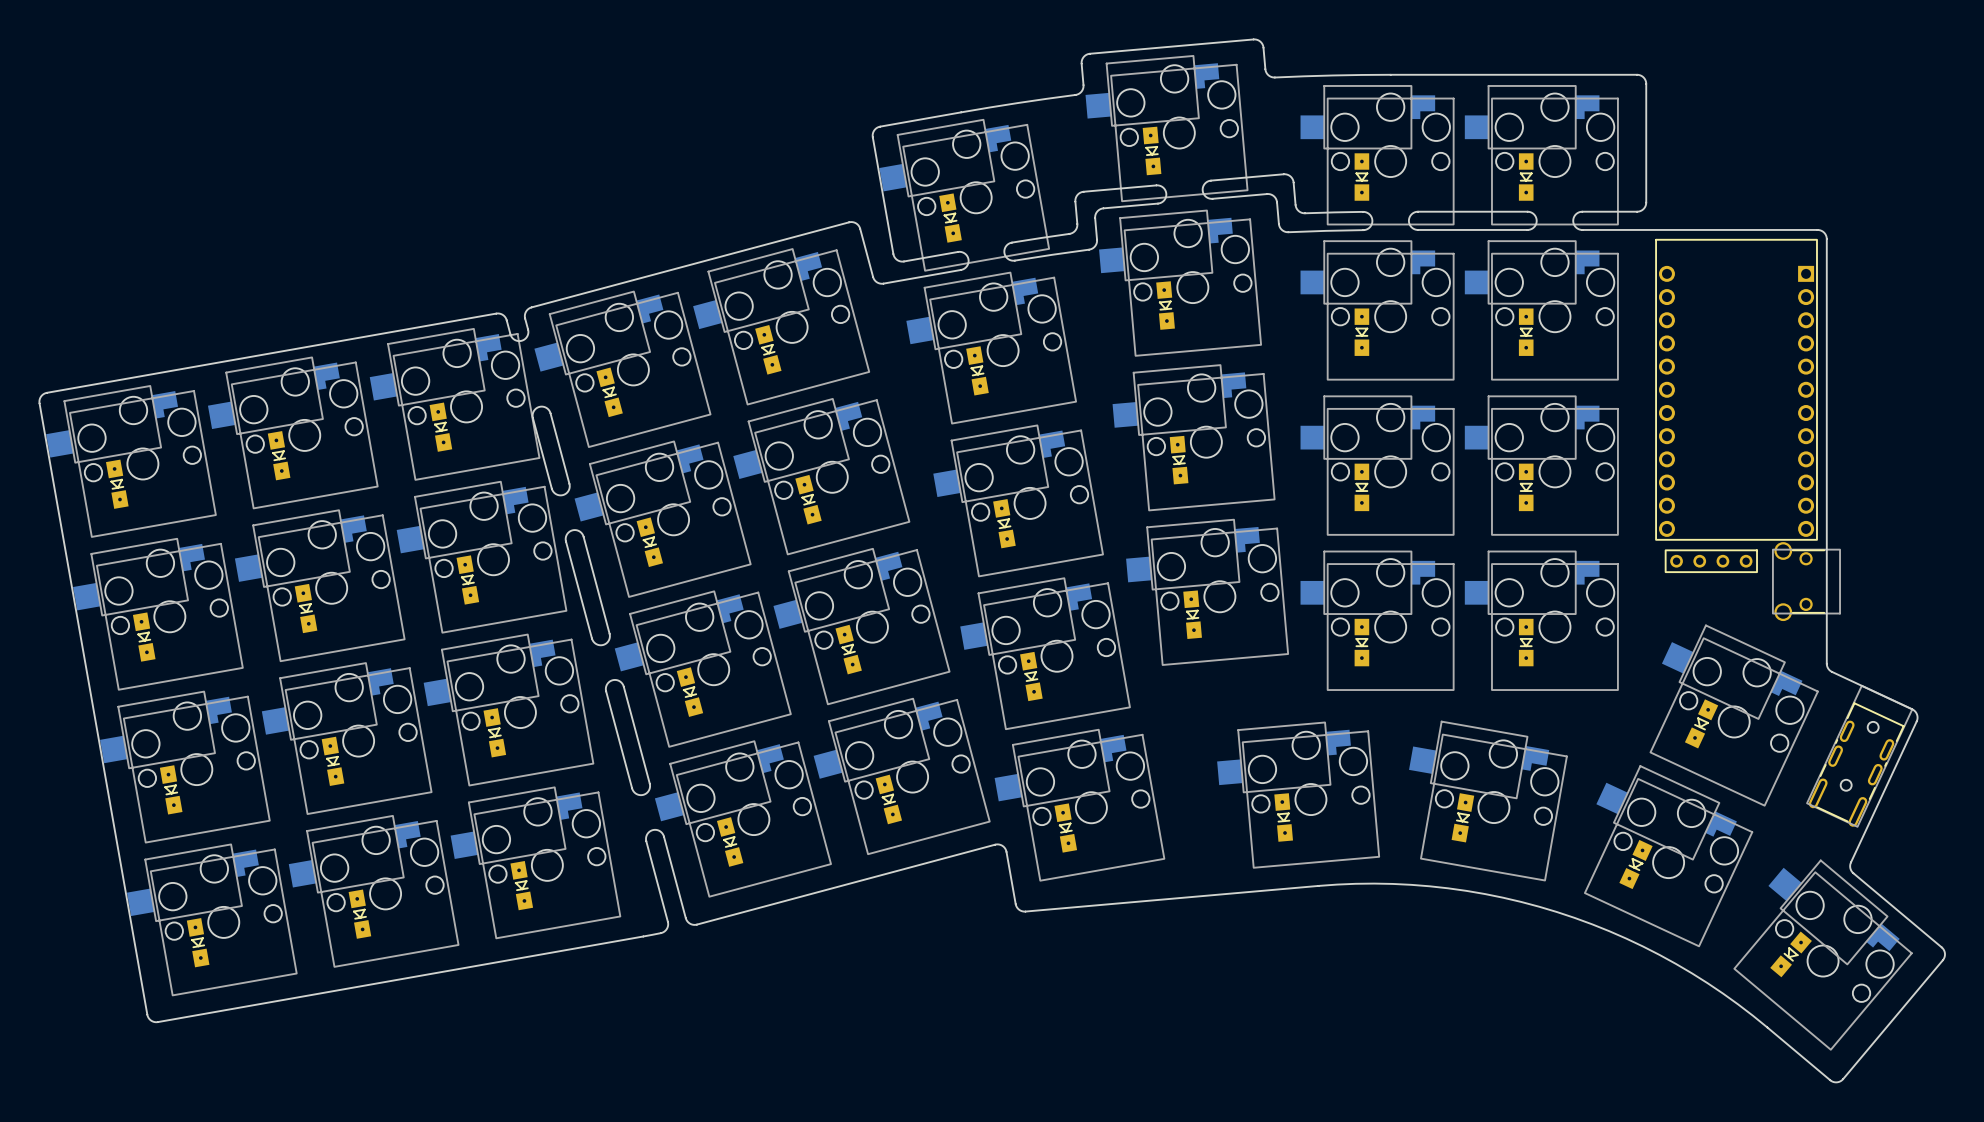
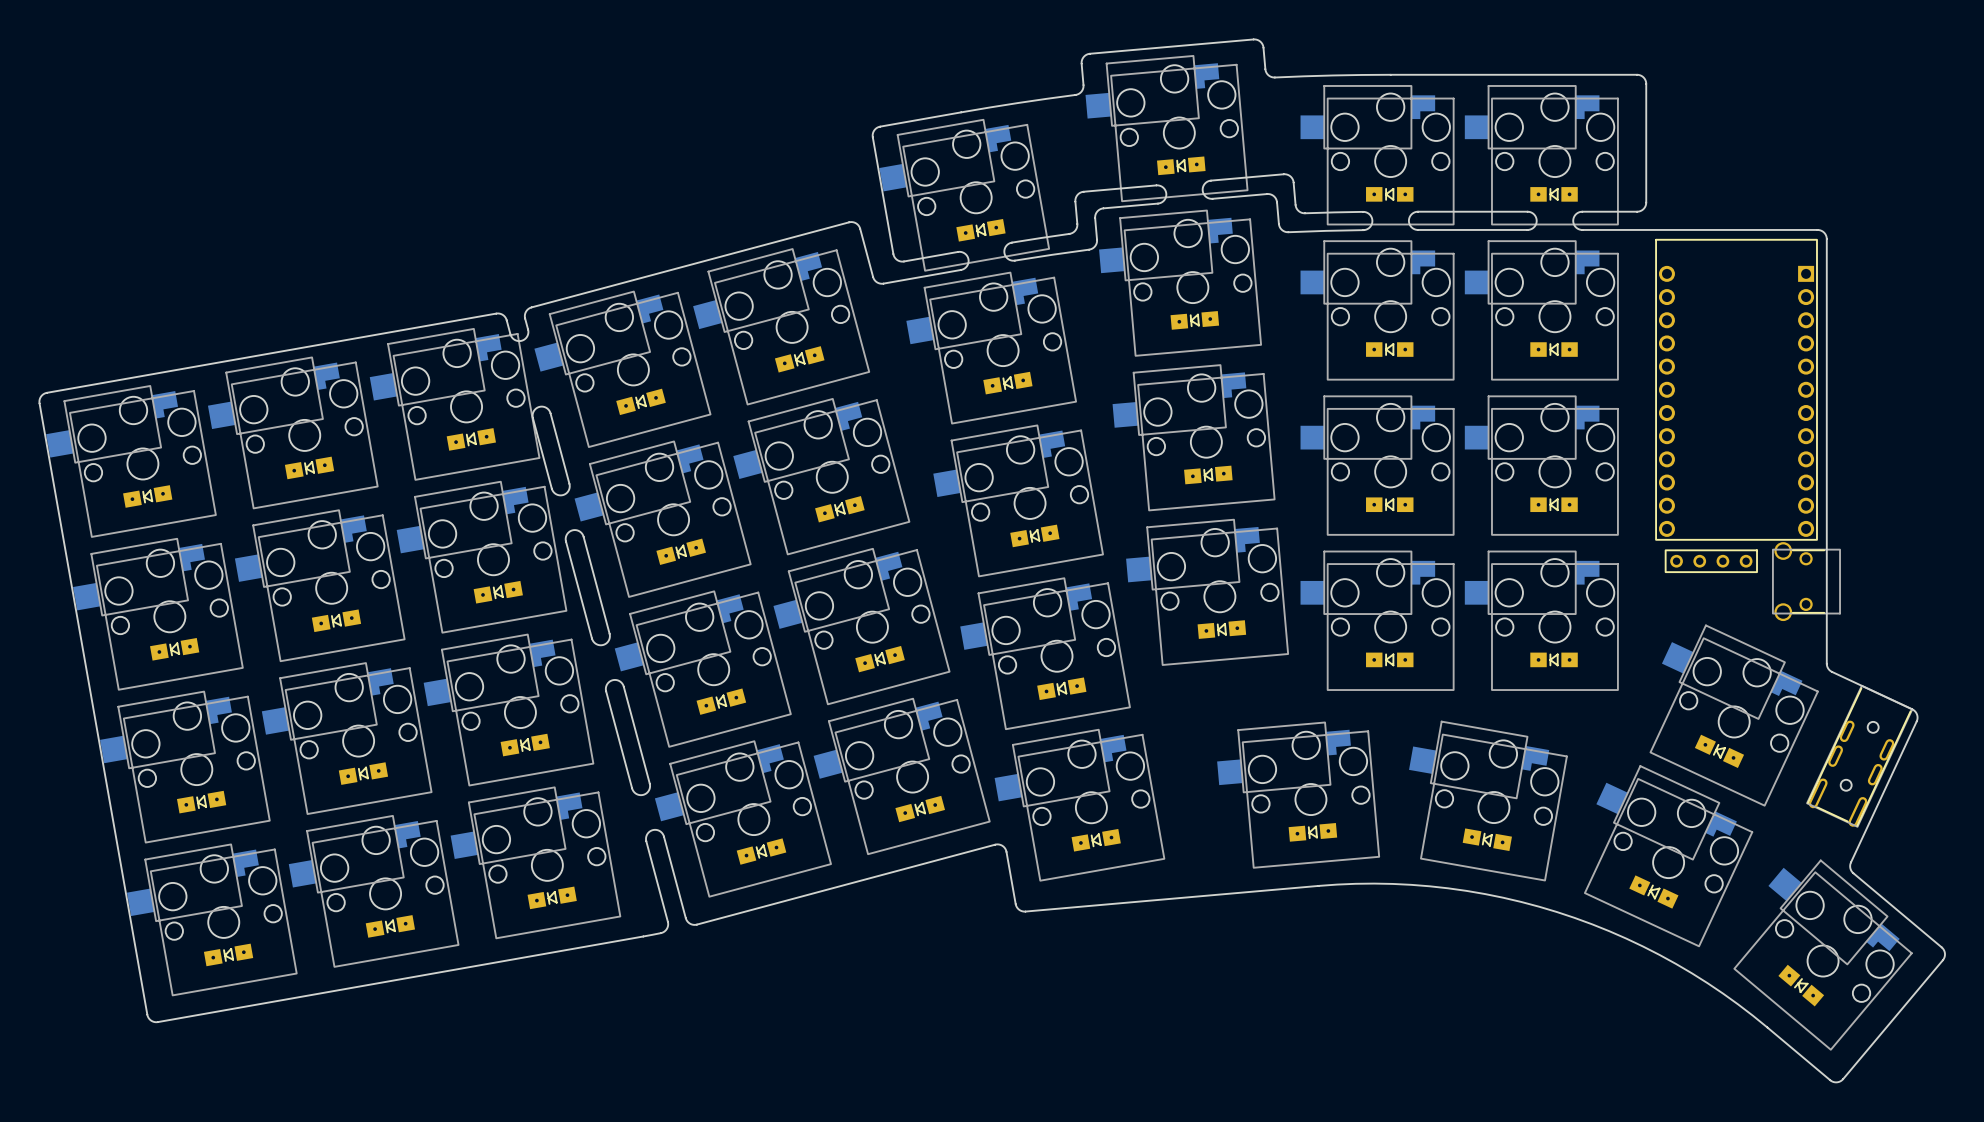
part footprint: [1085, 55, 1248, 202] -> [1085, 55, 1248, 202]
part footprint: [1300, 85, 1454, 225] -> [1300, 85, 1454, 225]
part footprint: [1464, 85, 1618, 225] -> [1464, 85, 1618, 225]
part footprint: [879, 119, 1050, 271] -> [879, 119, 1050, 271]
part footprint: [1099, 210, 1262, 356] -> [1099, 210, 1262, 356]
part footprint: [1300, 241, 1454, 380] -> [1300, 241, 1454, 380]
part footprint: [1464, 241, 1618, 380] -> [1464, 241, 1618, 380]
part footprint: [693, 249, 870, 405] -> [693, 249, 870, 405]
part footprint: [906, 272, 1077, 424] -> [906, 272, 1077, 424]
part footprint: [534, 291, 711, 448] -> [534, 291, 711, 448]
part footprint: [369, 328, 540, 480] -> [369, 328, 540, 480]
part footprint: [207, 357, 378, 509] -> [207, 357, 378, 509]
part footprint: [1112, 365, 1275, 511] -> [1112, 365, 1275, 511]
part footprint: [46, 385, 216, 537] -> [46, 385, 216, 537]
part footprint: [1300, 396, 1454, 535] -> [1300, 396, 1454, 535]
part footprint: [1464, 396, 1618, 535] -> [1464, 396, 1618, 535]
part footprint: [733, 398, 910, 555] -> [733, 398, 910, 555]
part footprint: [933, 425, 1104, 577] -> [933, 425, 1104, 577]
part footprint: [574, 441, 751, 597] -> [574, 441, 751, 597]
part footprint: [396, 481, 567, 633] -> [396, 481, 567, 633]
part footprint: [234, 510, 405, 662] -> [234, 510, 405, 662]
part footprint: [1126, 519, 1289, 665] -> [1126, 519, 1289, 665]
part footprint: [73, 538, 243, 690] -> [73, 538, 243, 690]
part footprint: [773, 548, 950, 705] -> [773, 548, 950, 705]
part footprint: [1300, 551, 1454, 691] -> [1300, 551, 1454, 691]
part footprint: [1464, 551, 1618, 691] -> [1464, 551, 1618, 691]
part footprint: [960, 578, 1130, 730] -> [960, 578, 1130, 730]
part footprint: [614, 591, 791, 747] -> [614, 591, 791, 747]
part footprint: [1650, 625, 1818, 806] -> [1650, 625, 1818, 806]
part footprint: [423, 634, 594, 786] -> [423, 634, 594, 786]
part footprint: [261, 663, 432, 815] -> [261, 663, 432, 815]
part footprint: [1807, 685, 1913, 827] -> [1807, 685, 1913, 827]
part footprint: [100, 691, 270, 843] -> [100, 691, 270, 843]
part footprint: [813, 698, 990, 855] -> [813, 698, 990, 855]
part footprint: [1409, 721, 1567, 881] -> [1409, 721, 1567, 881]
part footprint: [1217, 722, 1380, 868] -> [1217, 722, 1380, 868]
part footprint: [994, 729, 1165, 881] -> [994, 729, 1165, 881]
part footprint: [654, 741, 832, 897] -> [654, 741, 832, 897]
part footprint: [1584, 766, 1753, 947] -> [1584, 766, 1753, 947]
part footprint: [450, 787, 621, 939] -> [450, 787, 621, 939]
part footprint: [288, 815, 459, 967] -> [288, 815, 459, 967]
part footprint: [126, 844, 297, 996] -> [126, 844, 297, 996]
part footprint: [1734, 860, 1912, 1050] -> [1734, 860, 1912, 1050]

